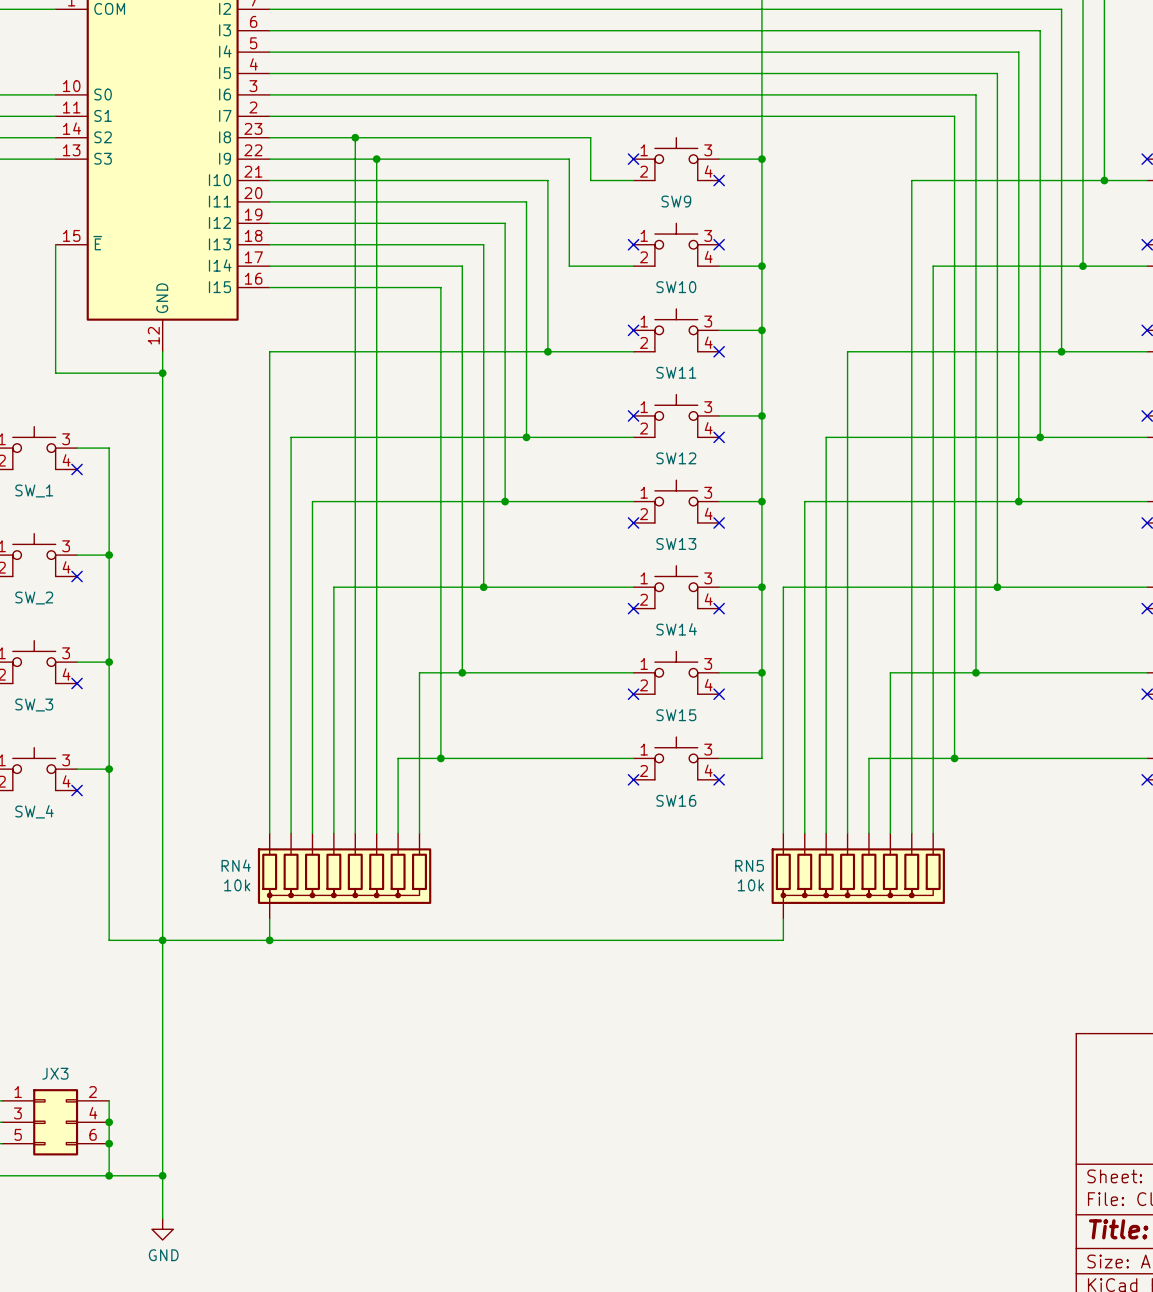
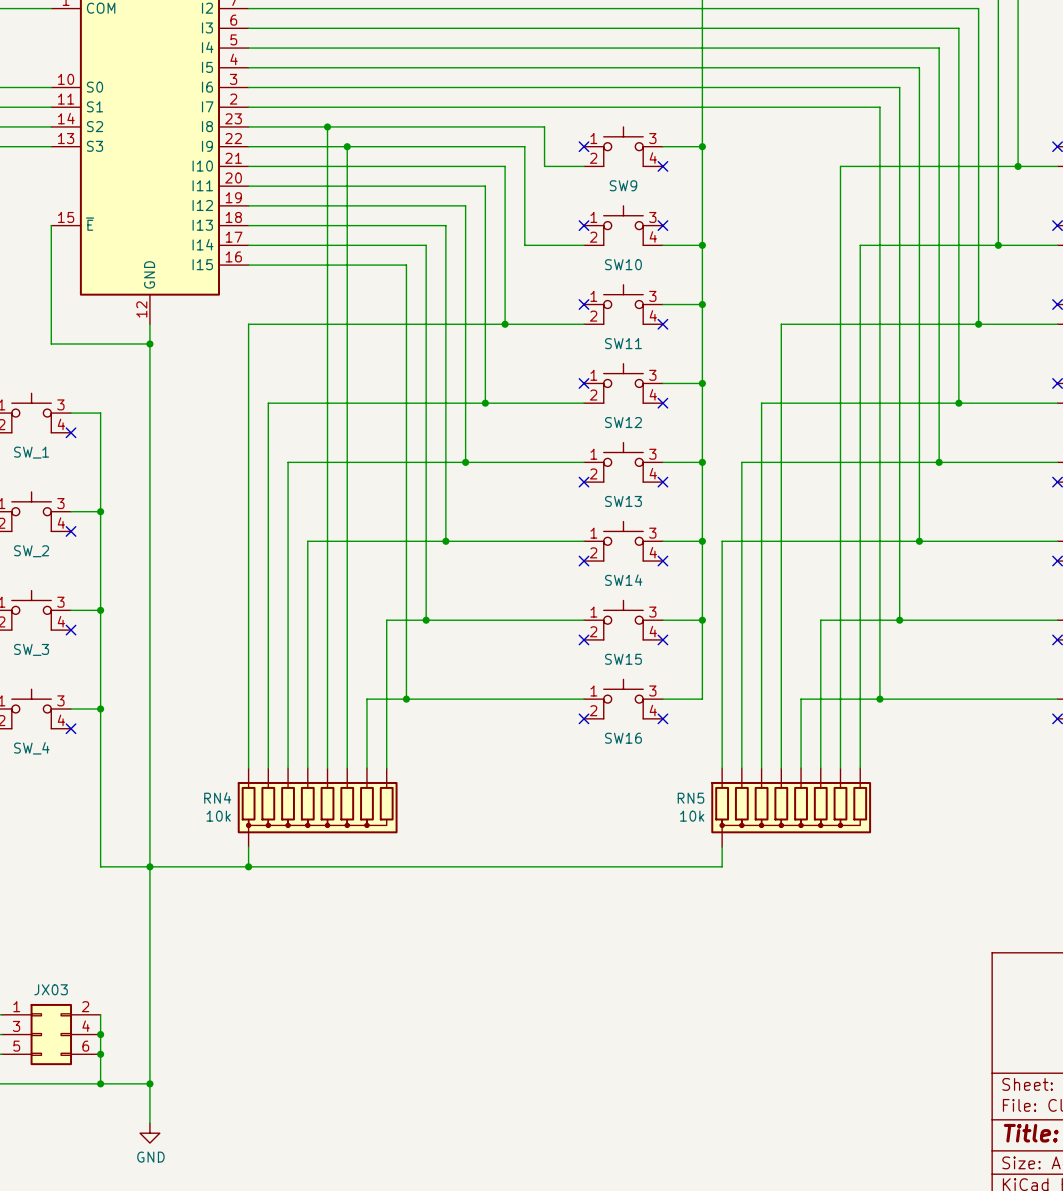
JX3 name: JX3 (55, 1073) -> JX03 (51, 989)

